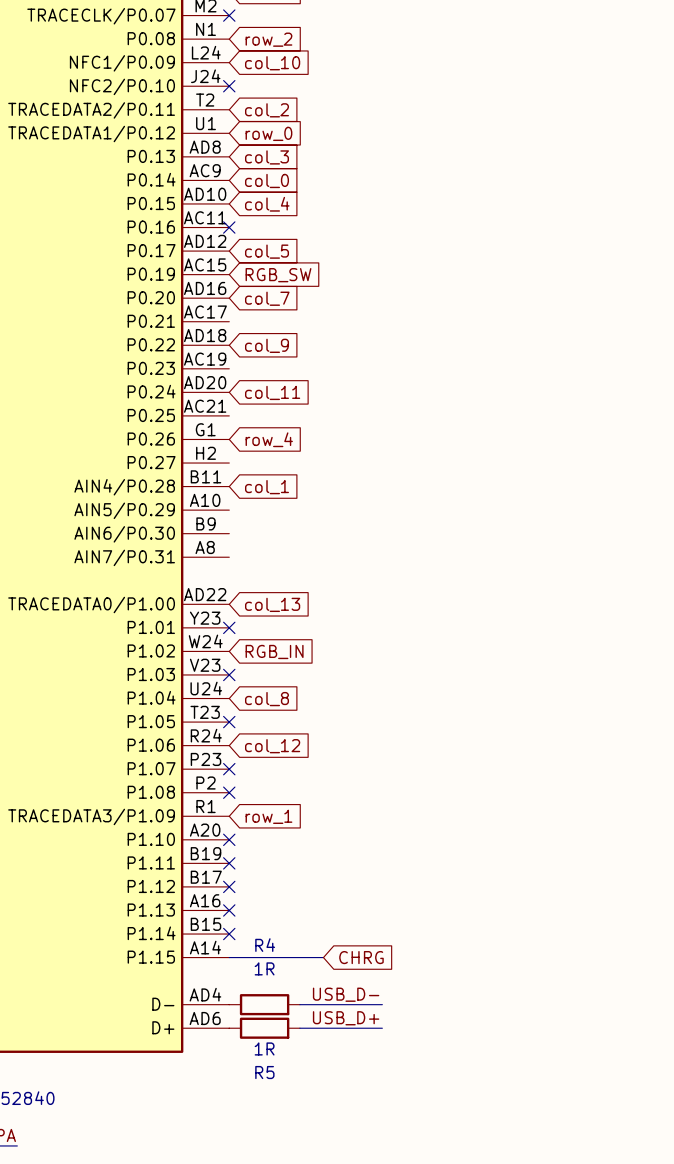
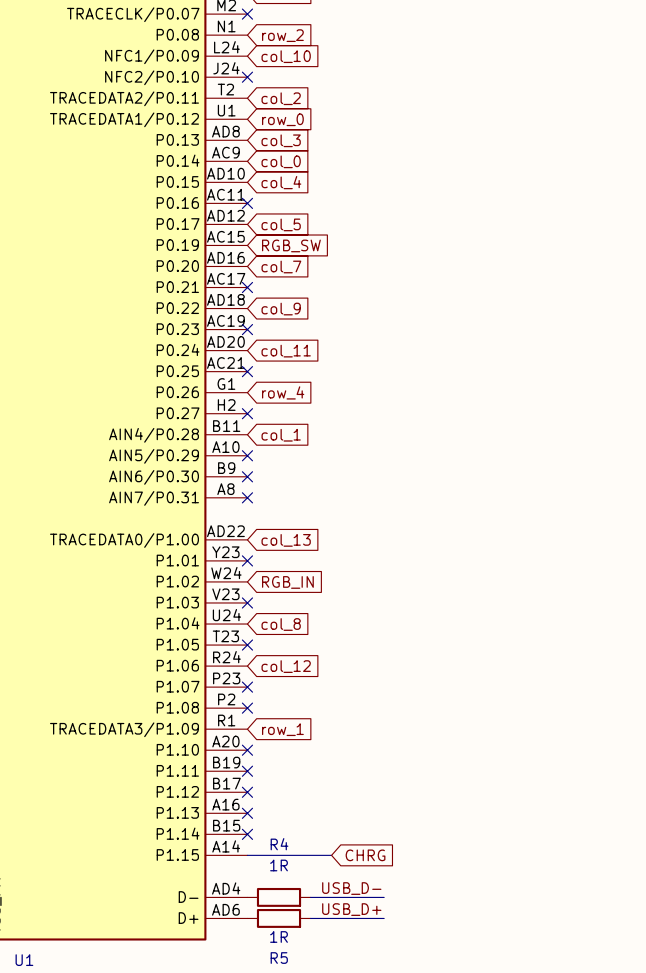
no-connect mark: none -> (247, 287)
no-connect mark: none -> (247, 329)
no-connect mark: none -> (247, 371)
no-connect mark: none -> (247, 413)
no-connect mark: none -> (247, 455)
no-connect mark: none -> (247, 476)
no-connect mark: none -> (247, 497)

